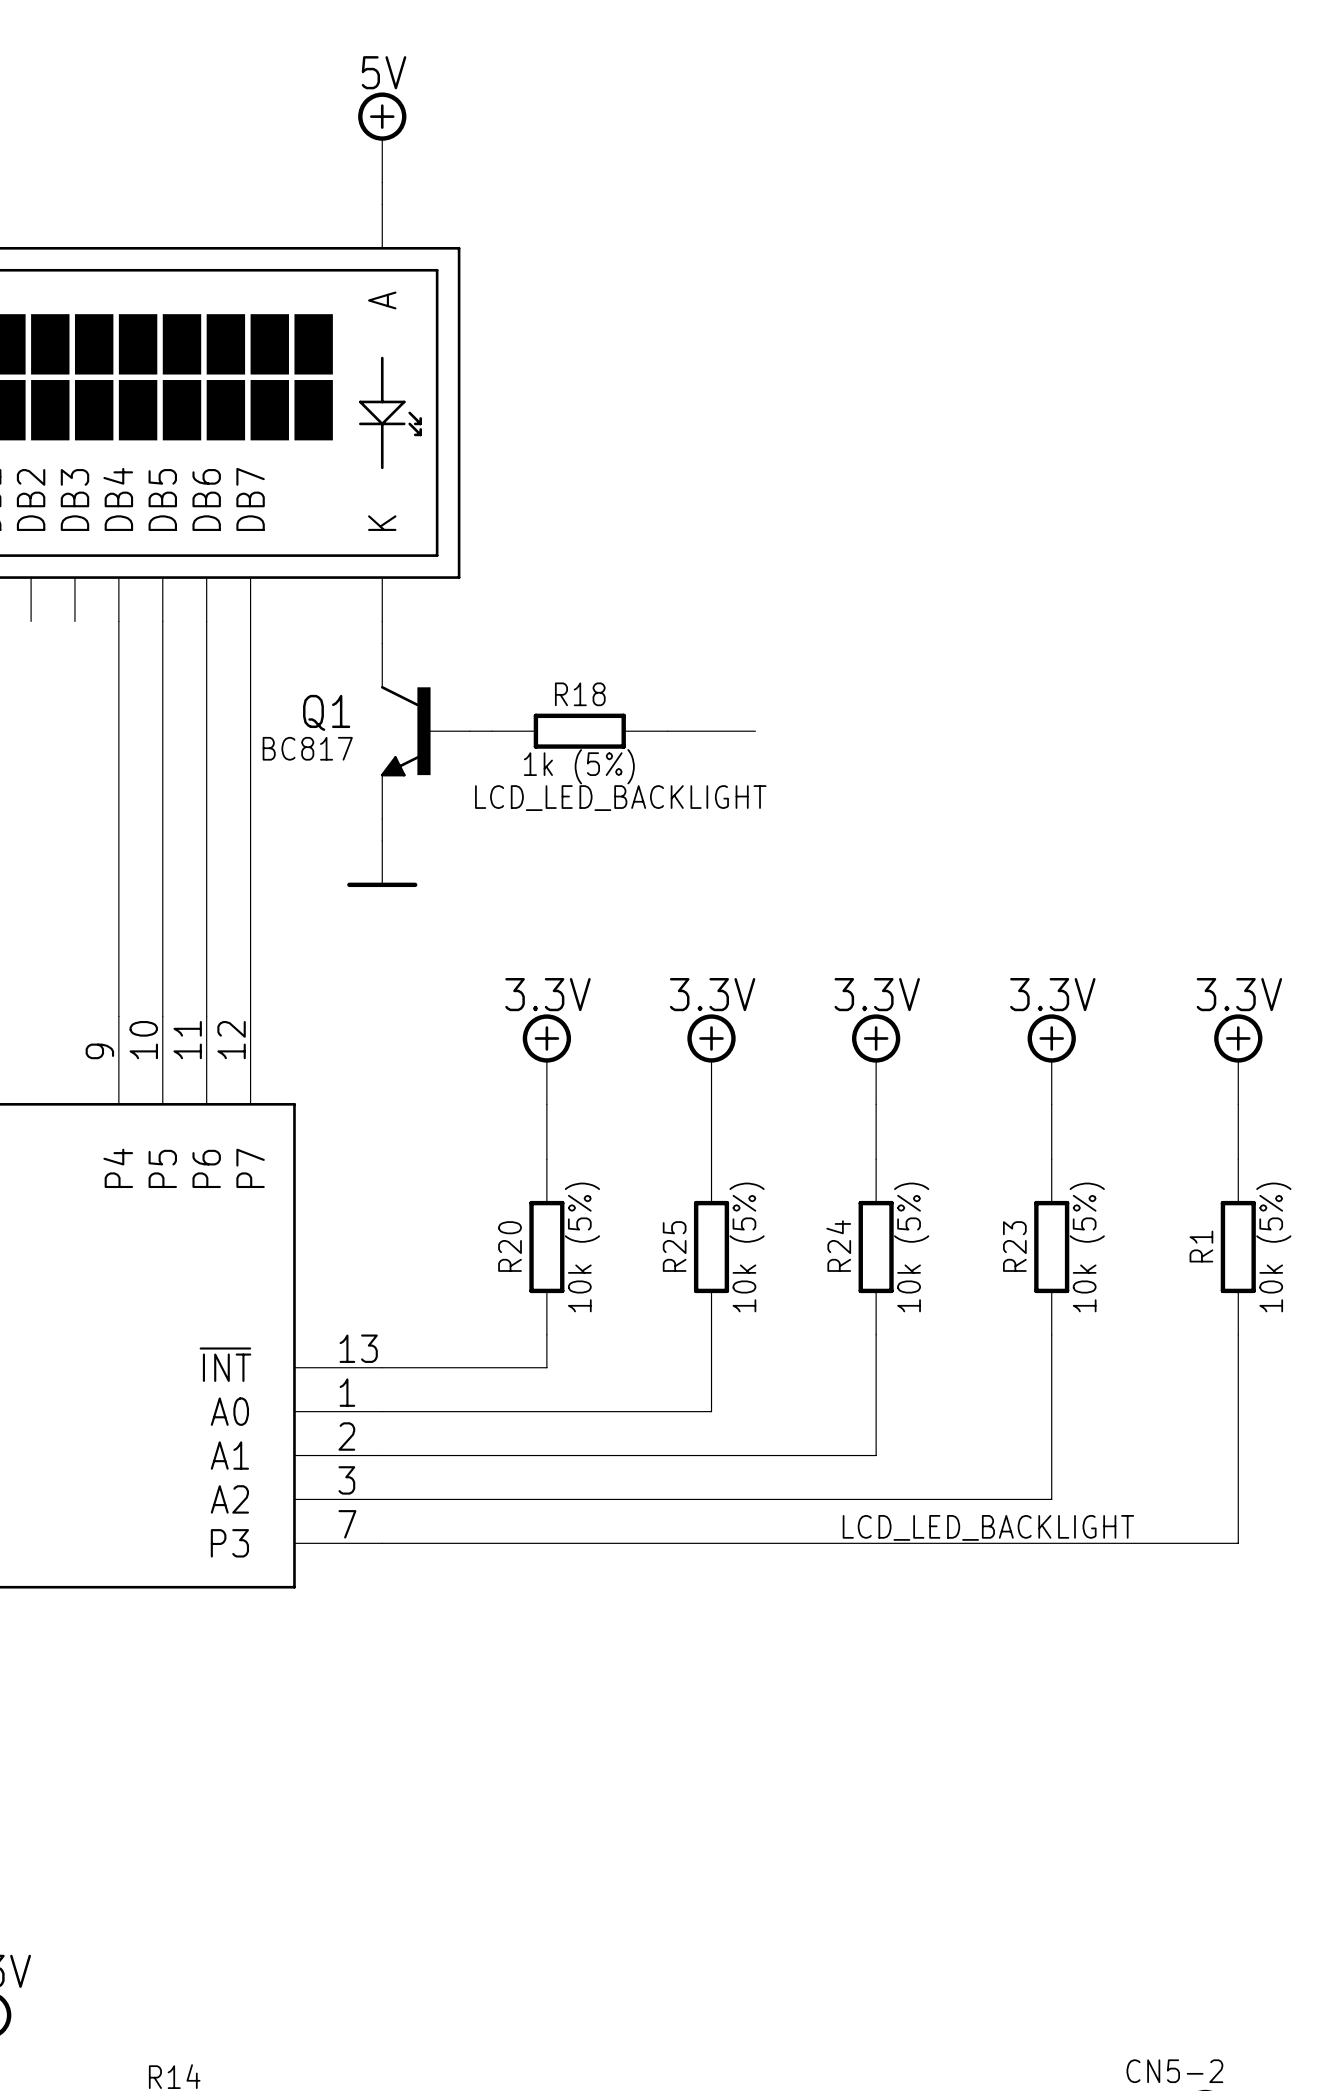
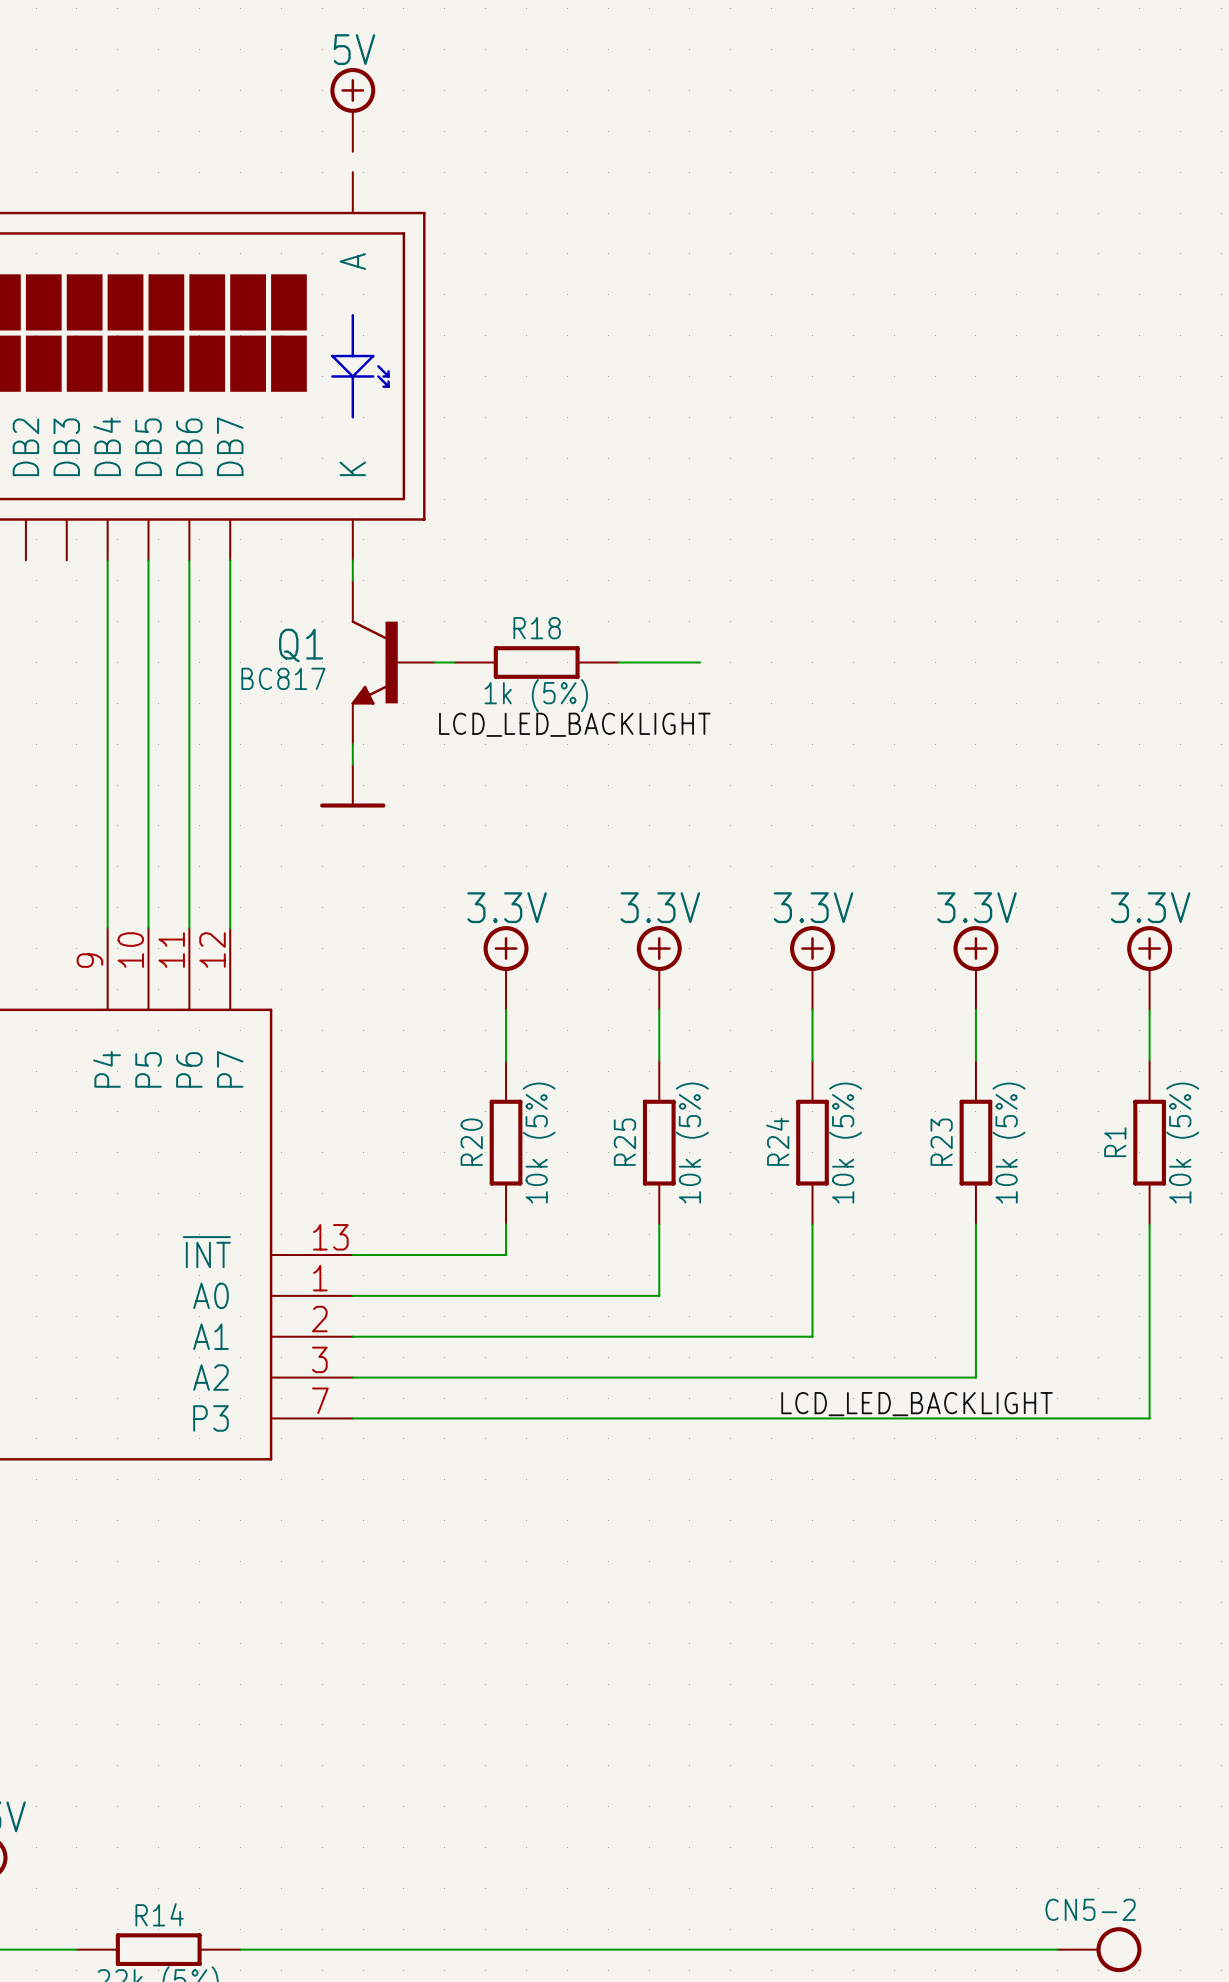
wire: (382, 182) (382, 204) -> none

